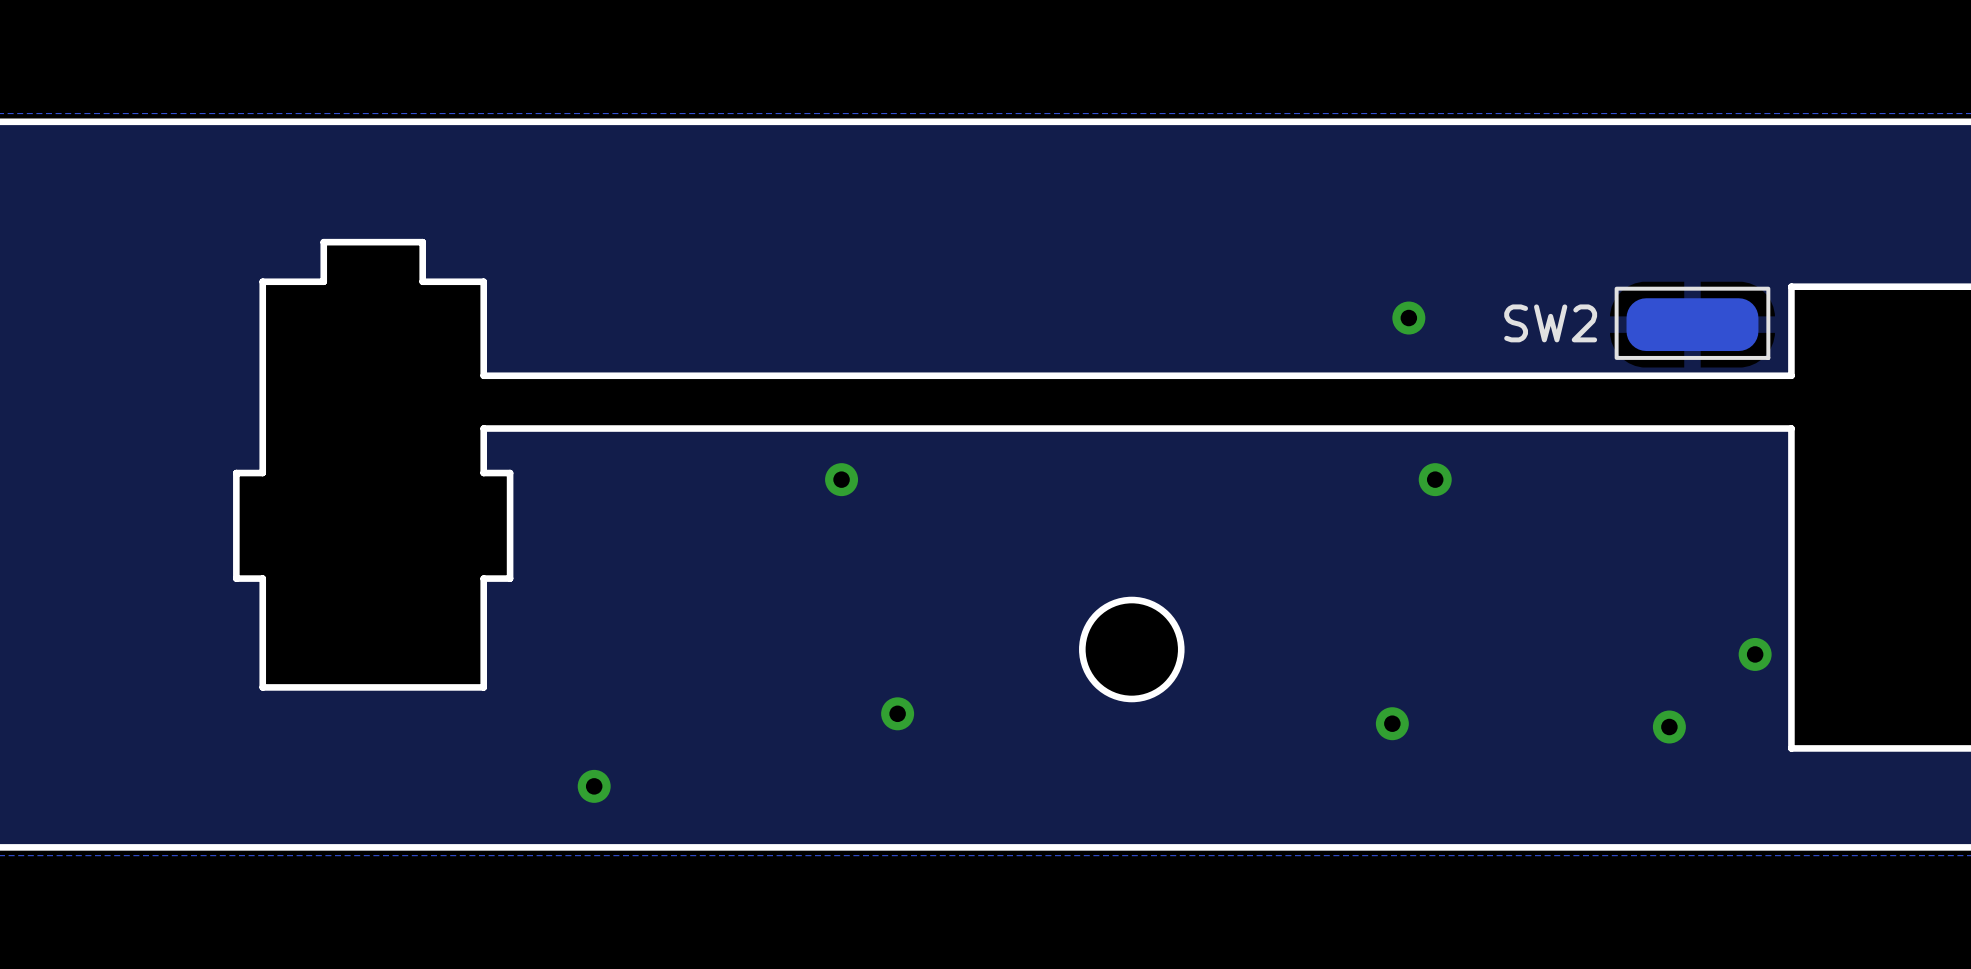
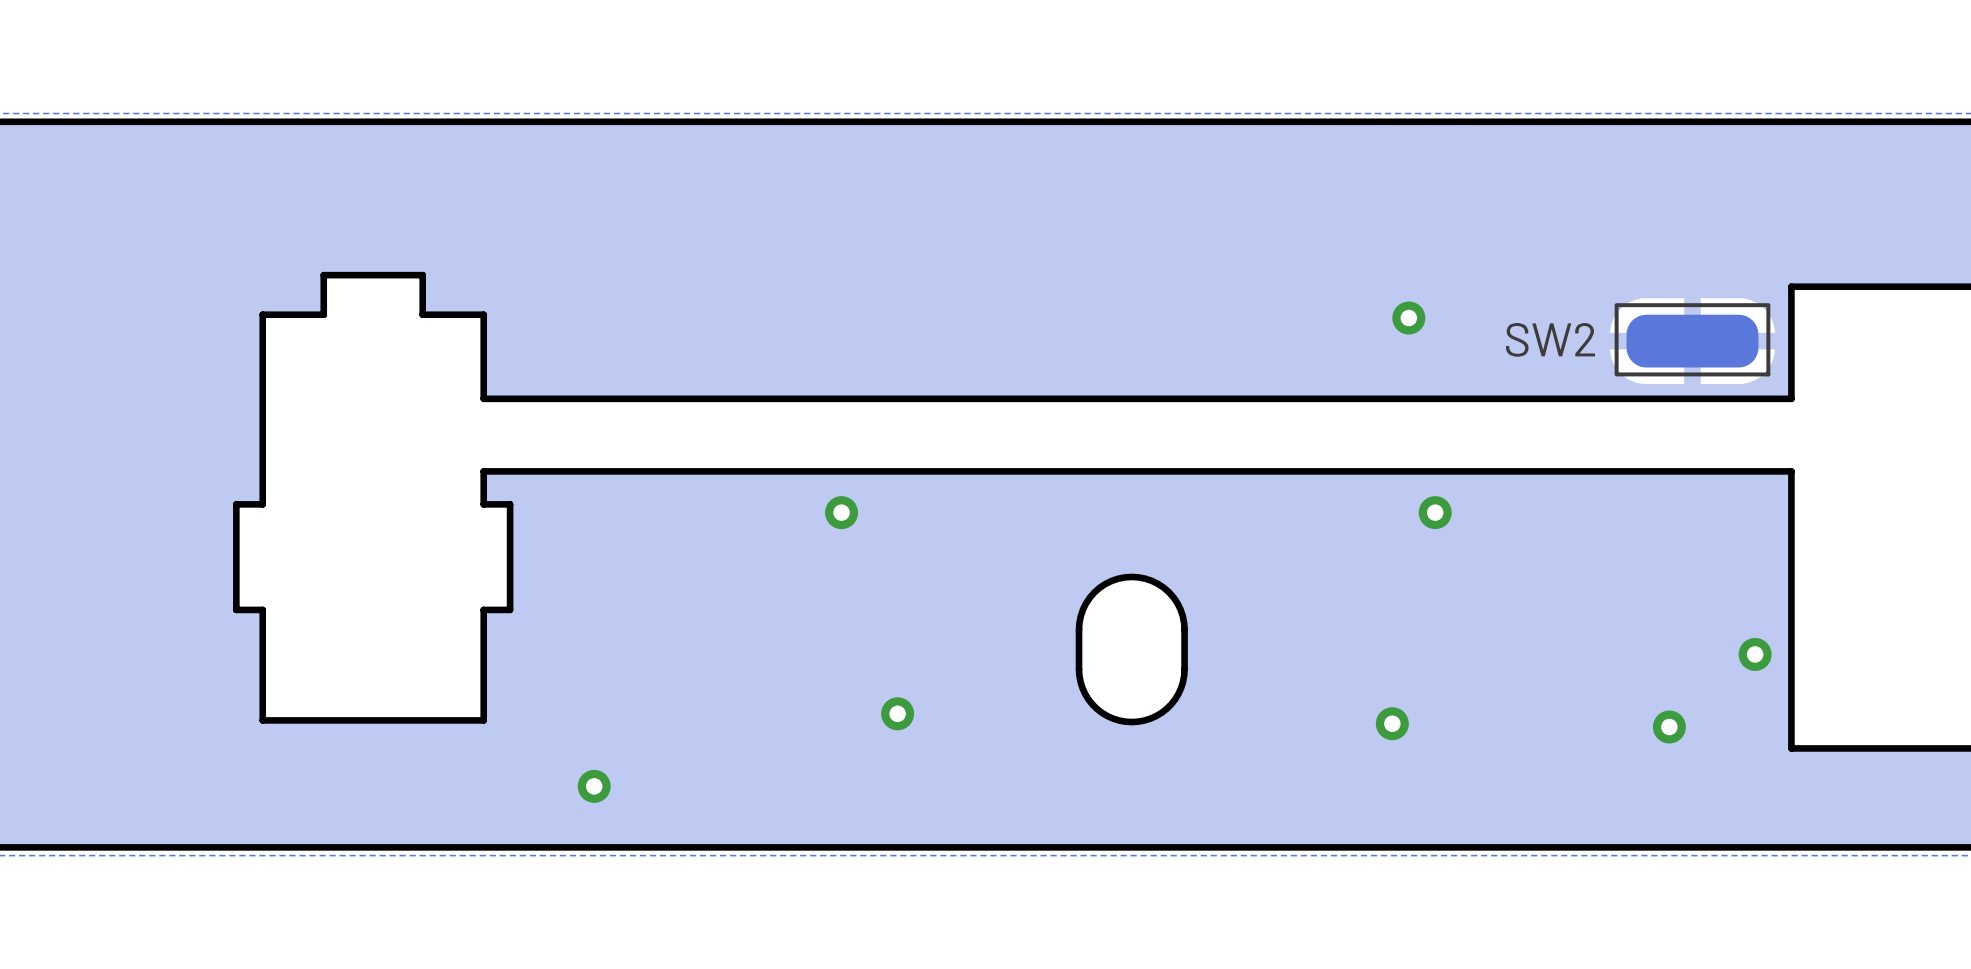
board edge: (422, 275) (422, 242) (323, 242) (323, 275) -> (422, 275) (323, 275)
board edge: (323, 281) (262, 281) (262, 314) -> (323, 281) (323, 314) (262, 314)
board edge: (422, 281) (483, 281) (483, 314) -> (422, 281) (422, 314) (483, 314)
part position: (1692, 323) -> (1692, 339)
board edge: (1791, 375) (483, 375) -> (1791, 375) (1791, 398) (483, 398) (483, 375)
board edge: (1791, 471) (1791, 428) (483, 428) (483, 471) -> (1791, 471) (483, 471)
board edge: (262, 473) (236, 473) (236, 504) -> (262, 473) (262, 504) (236, 504)
board edge: (483, 473) (510, 473) (510, 504) -> (483, 473) (483, 504) (510, 504)
via position: (841, 479) -> (841, 512)
via position: (1435, 479) -> (1435, 512)
board edge: (236, 578) (262, 578) (262, 609) -> (236, 578) (236, 609) (262, 609)
board edge: (510, 578) (483, 578) (483, 609) -> (510, 578) (510, 609) (483, 609)
round board edge: [1079, 596, 1185, 703] -> none
board edge: none -> (1184, 629) (1183, 681) (1175, 699) (1161, 712) (1144, 720) (1125, 721) (1107, 716) (1096, 708) (1088, 699) (1082, 687) (1079, 675) (1079, 622) (1086, 603) (1099, 587) (1118, 578) (1131, 576) (1145, 578) (1158, 584) (1169, 592) (1177, 603) (1182, 616) (1184, 629)
board edge: (483, 687) (262, 687) -> (483, 687) (483, 720) (262, 720) (262, 687)

